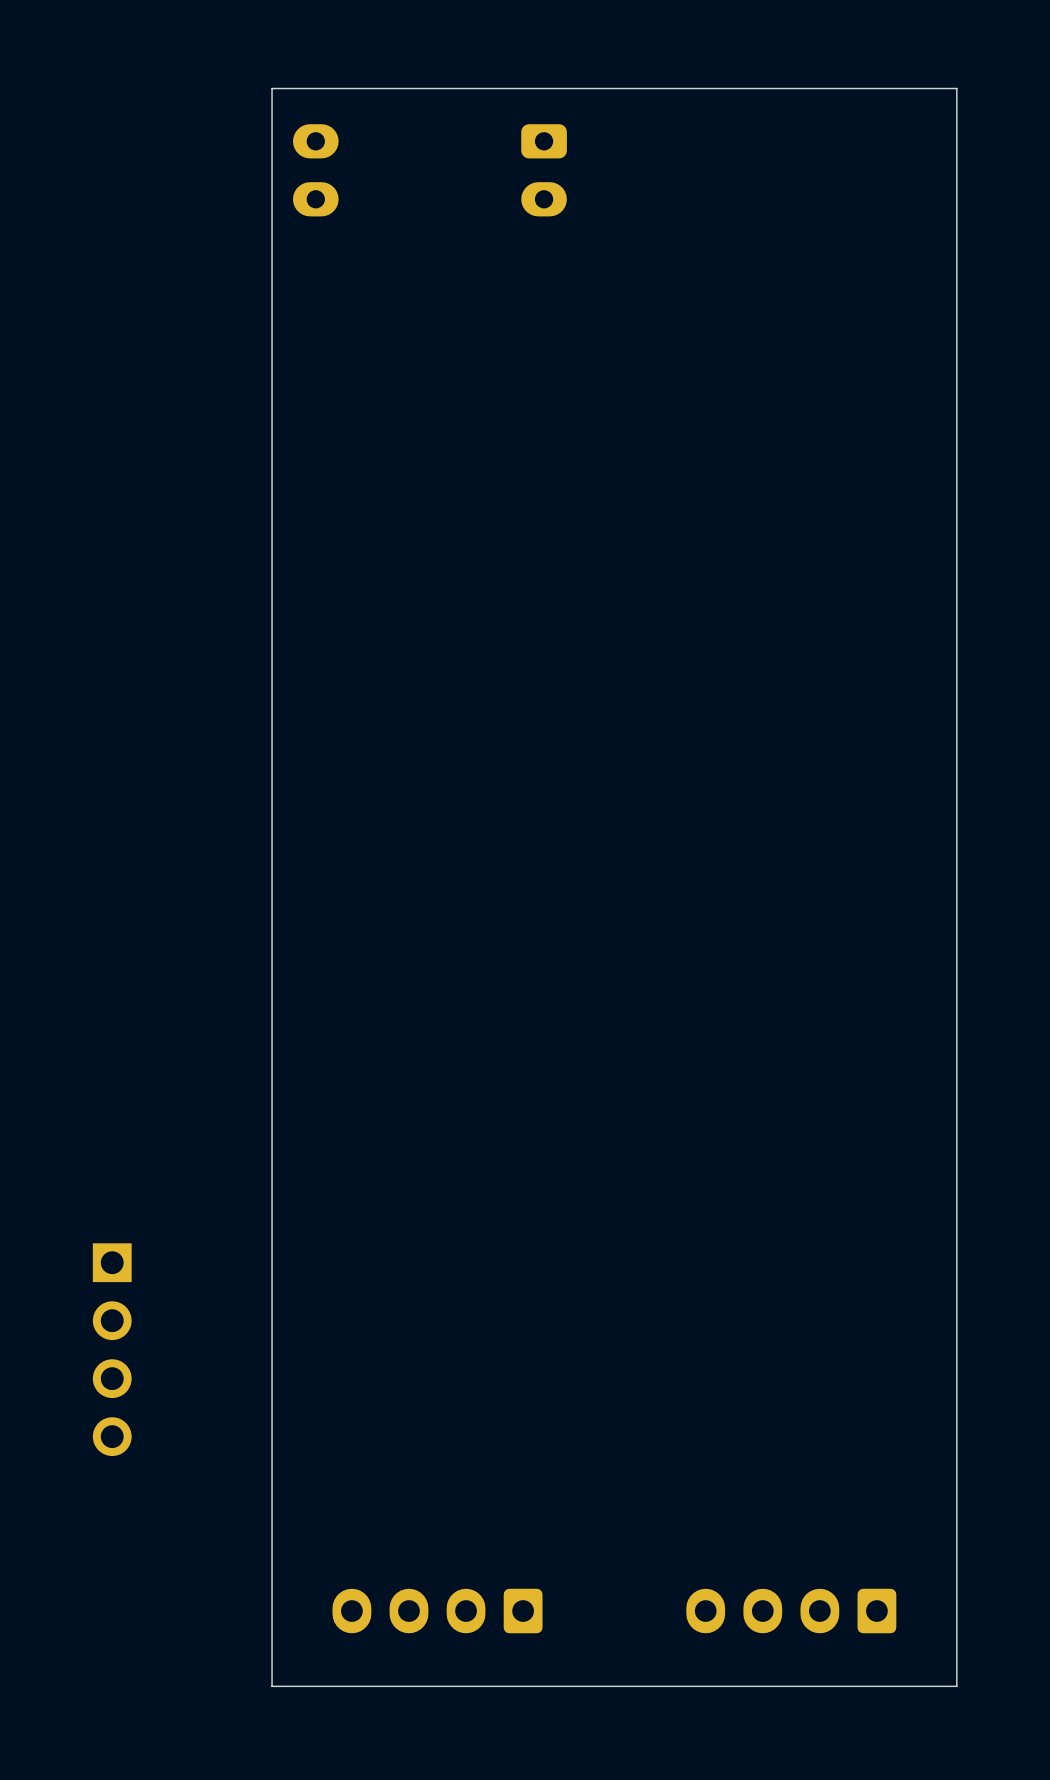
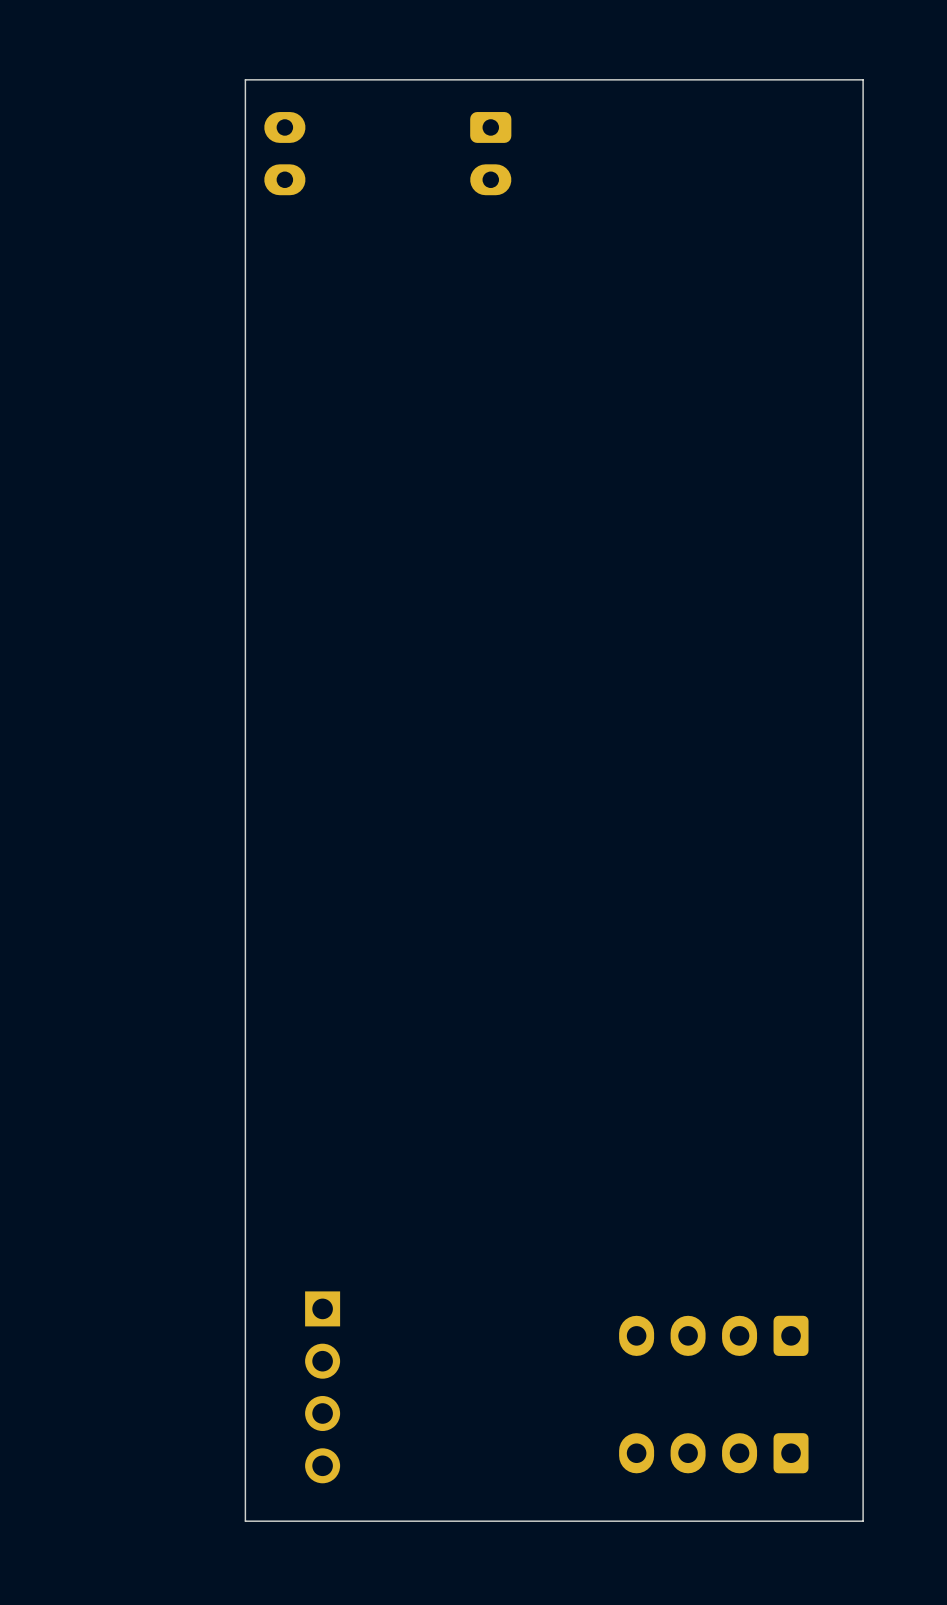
part position: (112, 1349) -> (322, 1387)
part position: (437, 1611) -> (713, 1335)

